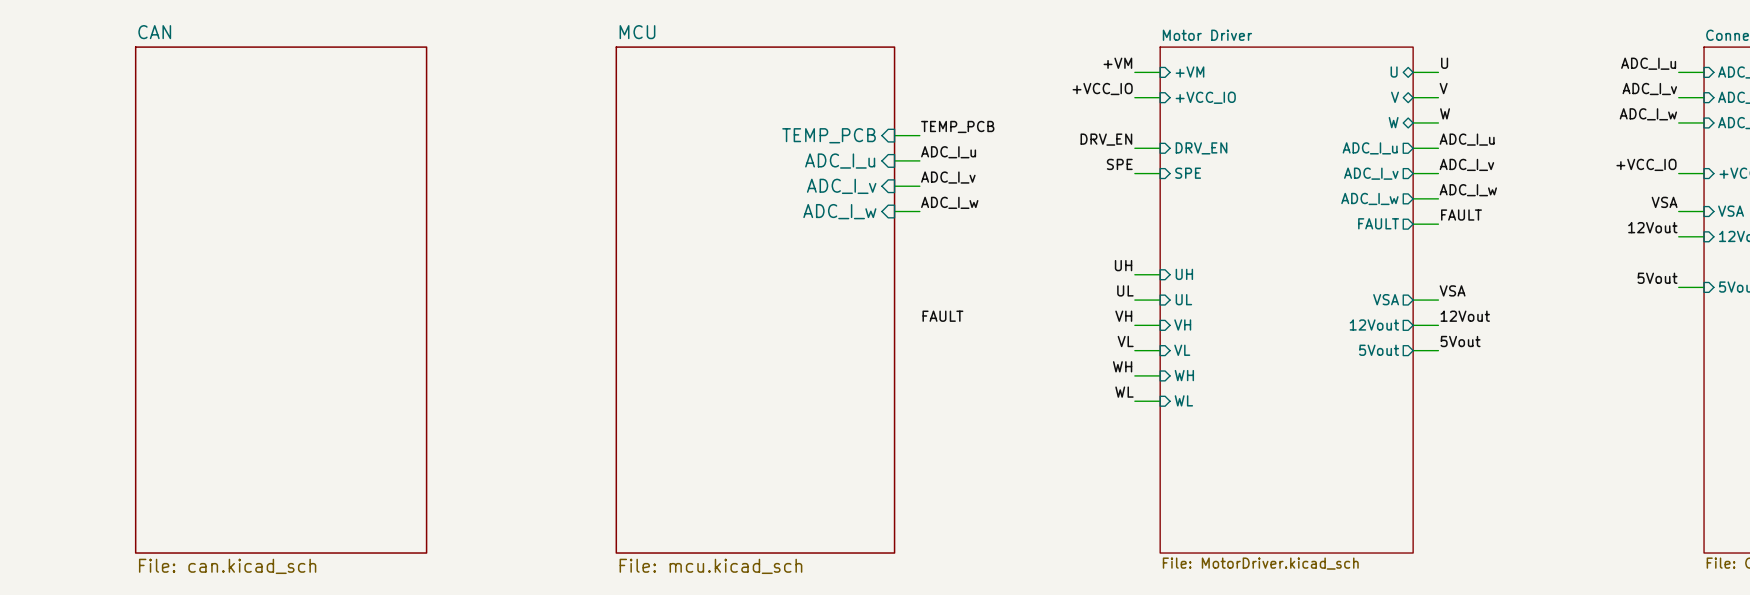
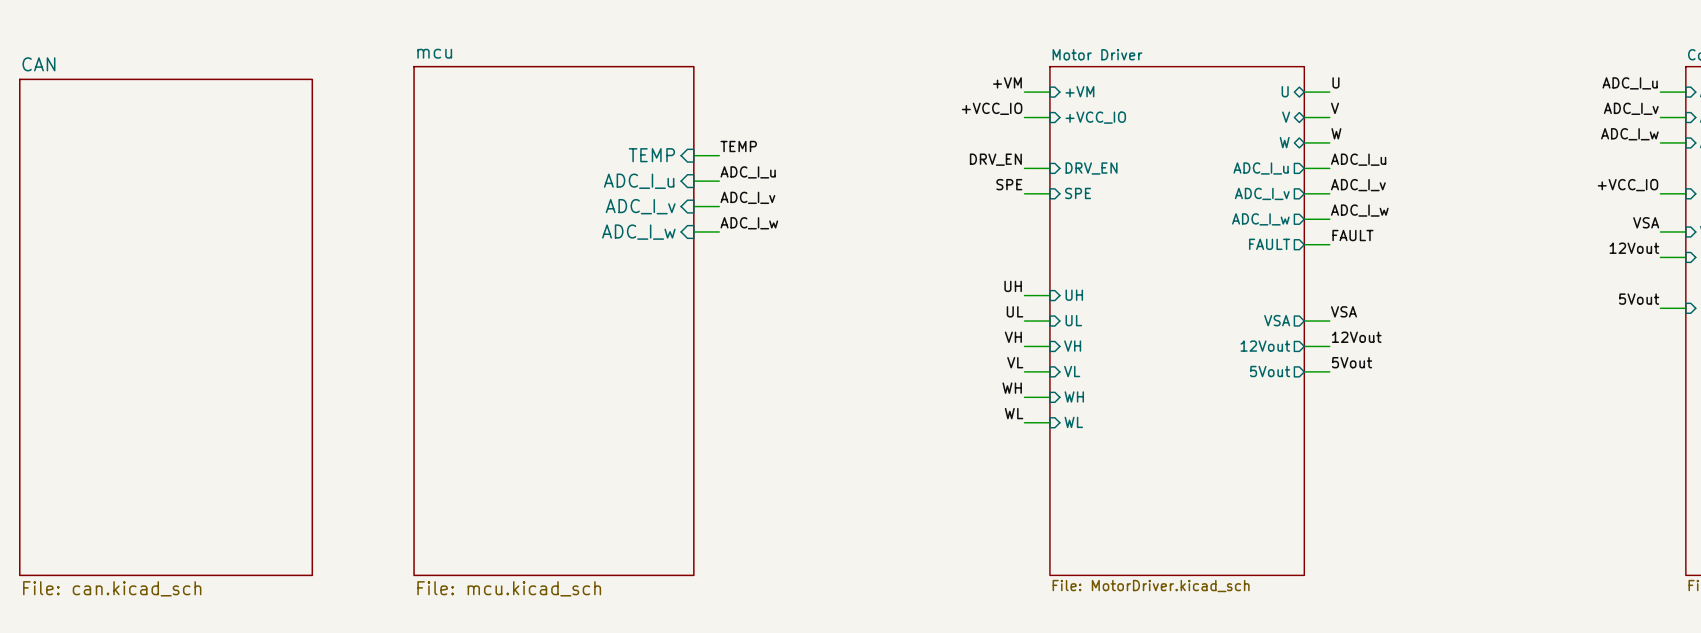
label position: +VM (1117, 63) -> +VM (1007, 82)
label position: U (1444, 63) -> U (1335, 82)
wire: (1134, 72) (1160, 72) -> (1024, 92) (1049, 92)
sheet pin position: +VM (1190, 72) -> +VM (1079, 91)
sheet pin position: U (1394, 72) -> U (1285, 91)
wire: (1413, 72) (1438, 72) -> (1304, 92) (1329, 92)
label position: V (1443, 88) -> V (1335, 108)
label position: +VCC_IO (1102, 89) -> +VCC_IO (992, 108)
wire: (1134, 97) (1160, 97) -> (1024, 117) (1049, 117)
sheet pin position: +VCC_IO (1205, 97) -> +VCC_IO (1095, 117)
sheet pin position: V (1395, 97) -> V (1286, 117)
wire: (1413, 97) (1438, 97) -> (1304, 117) (1329, 117)
label position: W (1445, 113) -> W (1336, 133)
sheet pin position: W (1393, 122) -> W (1284, 142)
wire: (1413, 122) (1438, 122) -> (1304, 142) (1329, 142)
label: none -> TEMP (738, 146)
label: TEMP_PCB (957, 126) -> none
sheet pin: none -> TEMP (651, 155)
sheet pin: TEMP_PCB (829, 135) -> none
wire: (894, 135) (919, 135) -> (693, 155) (719, 155)
label position: DRV_EN (1106, 139) -> DRV_EN (995, 159)
label position: ADC_I_u (1467, 139) -> ADC_I_u (1358, 159)
wire: (1134, 148) (1160, 148) -> (1024, 168) (1049, 168)
sheet pin position: DRV_EN (1201, 148) -> DRV_EN (1091, 168)
sheet pin position: ADC_I_u (1370, 148) -> ADC_I_u (1261, 168)
wire: (1413, 148) (1438, 148) -> (1304, 168) (1329, 168)
label position: ADC_I_u (948, 152) -> ADC_I_u (748, 172)
wire: (894, 160) (919, 160) -> (693, 181) (719, 181)
sheet pin position: ADC_I_u (840, 161) -> ADC_I_u (639, 181)
label position: SPE (1119, 164) -> SPE (1009, 184)
label position: ADC_I_v (1466, 164) -> ADC_I_v (1358, 185)
wire: (1134, 173) (1160, 173) -> (1024, 193) (1049, 193)
sheet pin position: SPE (1188, 173) -> SPE (1078, 193)
sheet pin position: ADC_I_v (1371, 173) -> ADC_I_v (1262, 193)
wire: (1413, 173) (1438, 173) -> (1304, 193) (1329, 193)
label position: ADC_I_v (948, 177) -> ADC_I_v (747, 197)
sheet pin position: ADC_I_v (841, 186) -> ADC_I_v (640, 206)
wire: (894, 186) (919, 186) -> (693, 206) (719, 206)
label position: ADC_I_w (1468, 190) -> ADC_I_w (1359, 210)
sheet pin position: ADC_I_w (1369, 198) -> ADC_I_w (1260, 219)
wire: (1413, 198) (1438, 198) -> (1304, 219) (1329, 219)
label position: ADC_I_w (949, 202) -> ADC_I_w (749, 223)
sheet pin position: ADC_I_w (839, 211) -> ADC_I_w (638, 232)
wire: (894, 211) (919, 211) -> (693, 231) (719, 231)
label position: FAULT (1461, 215) -> FAULT (1352, 235)
sheet pin position: FAULT (1378, 223) -> FAULT (1269, 244)
wire: (1413, 224) (1438, 224) -> (1304, 244) (1329, 244)
label position: UH (1123, 265) -> UH (1013, 286)
wire: (1134, 274) (1160, 274) -> (1024, 295) (1049, 295)
sheet pin position: UH (1184, 274) -> UH (1074, 295)
label position: UL (1125, 290) -> UL (1015, 311)
label position: VSA (1452, 290) -> VSA (1343, 311)
sheet pin position: UL (1183, 299) -> UL (1073, 320)
sheet pin position: VSA (1386, 299) -> VSA (1277, 320)
sheet CAN: File: can.kicad_sch (281, 300) -> none
sheet mcu: none -> File: mcu.kicad_sch (553, 321)
sheet MCU: File: mcu.kicad_sch (755, 300) -> none
wire: (1134, 300) (1160, 300) -> (1024, 321) (1049, 321)
sheet Motor Driver position: (1286, 300) -> (1177, 321)
wire: (1413, 300) (1438, 300) -> (1304, 321) (1329, 321)
sheet CAN: none -> File: can.kicad_sch (166, 327)
label: FAULT (942, 316) -> none
label position: VH (1123, 316) -> VH (1013, 337)
label position: 12Vout (1465, 316) -> 12Vout (1356, 337)
sheet pin position: VH (1182, 324) -> VH (1072, 346)
sheet pin position: 12Vout (1374, 324) -> 12Vout (1265, 346)
wire: (1134, 325) (1160, 325) -> (1024, 346) (1049, 346)
wire: (1413, 325) (1438, 325) -> (1304, 346) (1329, 346)
label position: VL (1125, 341) -> VL (1015, 362)
label position: 5Vout (1460, 341) -> 5Vout (1352, 362)
wire: (1134, 350) (1160, 350) -> (1024, 371) (1049, 371)
sheet pin position: VL (1182, 350) -> VL (1072, 371)
sheet pin position: 5Vout (1379, 350) -> 5Vout (1270, 371)
wire: (1413, 350) (1438, 350) -> (1304, 371) (1329, 371)
label position: WH (1122, 366) -> WH (1012, 388)
wire: (1134, 375) (1160, 375) -> (1024, 397) (1049, 397)
sheet pin position: WH (1184, 375) -> WH (1074, 396)
label position: WL (1124, 392) -> WL (1014, 413)
sheet pin position: WL (1183, 400) -> WL (1073, 422)
wire: (1134, 401) (1160, 401) -> (1024, 422) (1049, 422)

